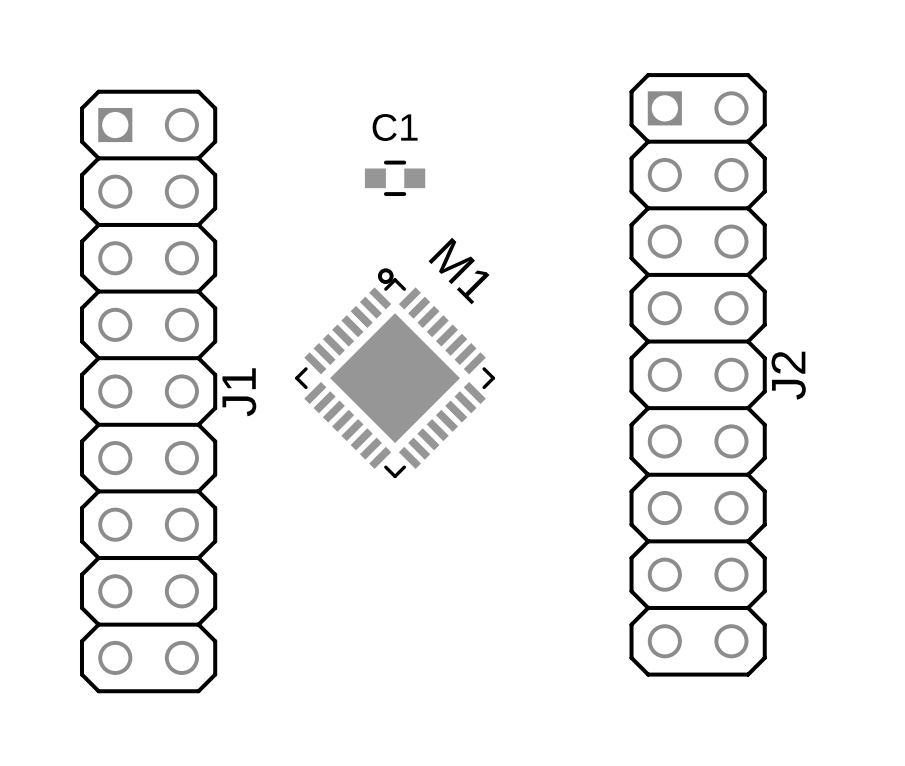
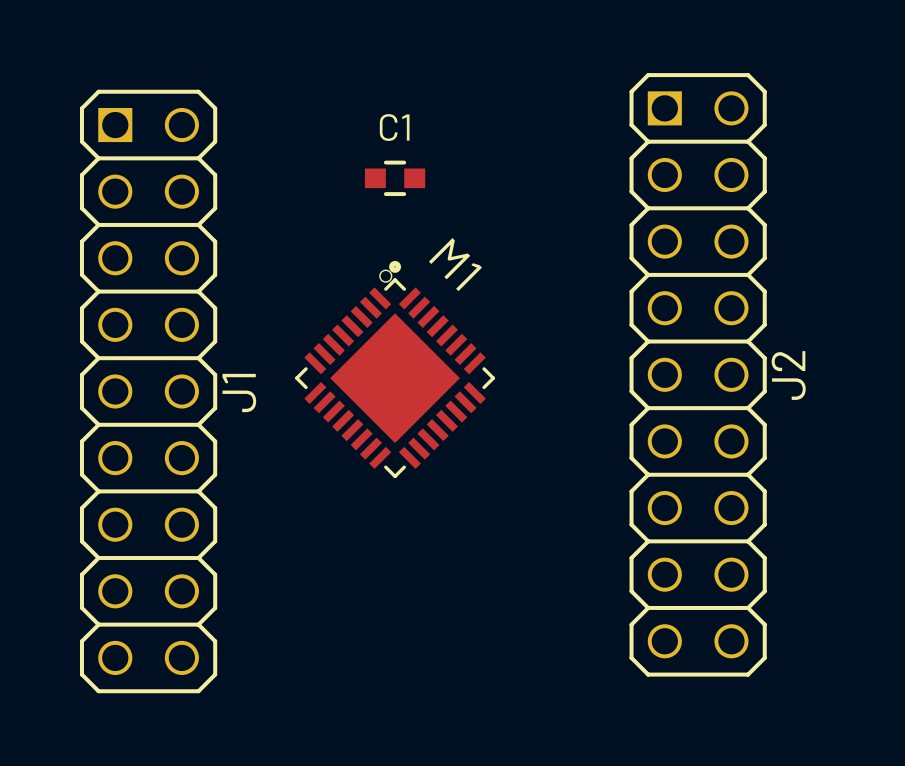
M1 footprint: [295, 268, 496, 479] -> [295, 260, 496, 479]

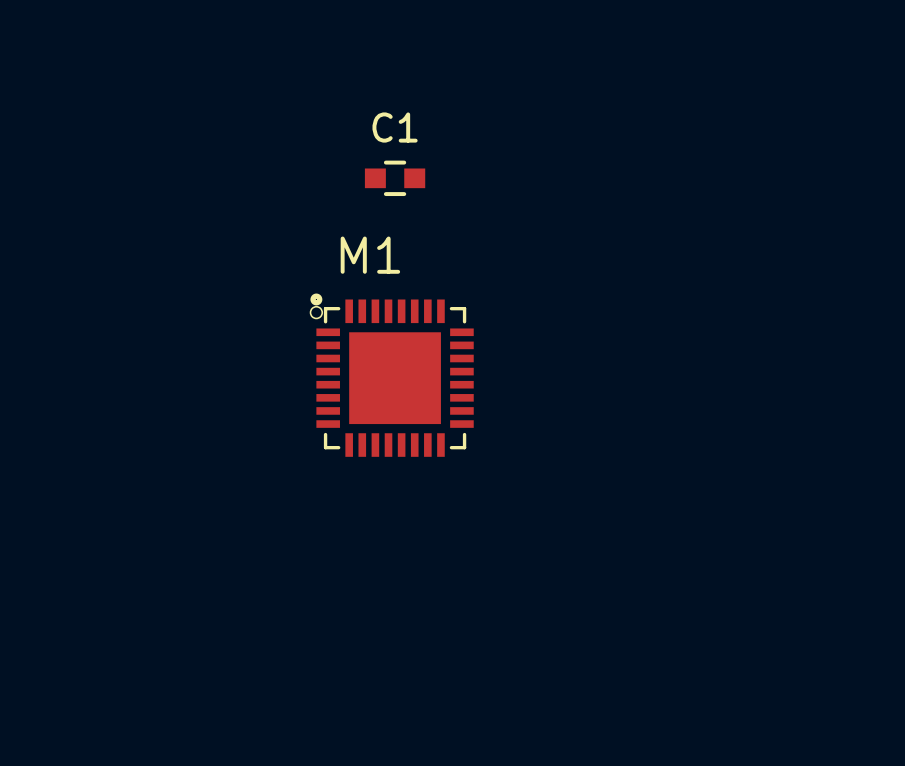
M1 rotation: 0° (395, 369) -> 45° counterclockwise (392, 375)
J2: (698, 374) -> none
J1: (148, 391) -> none

